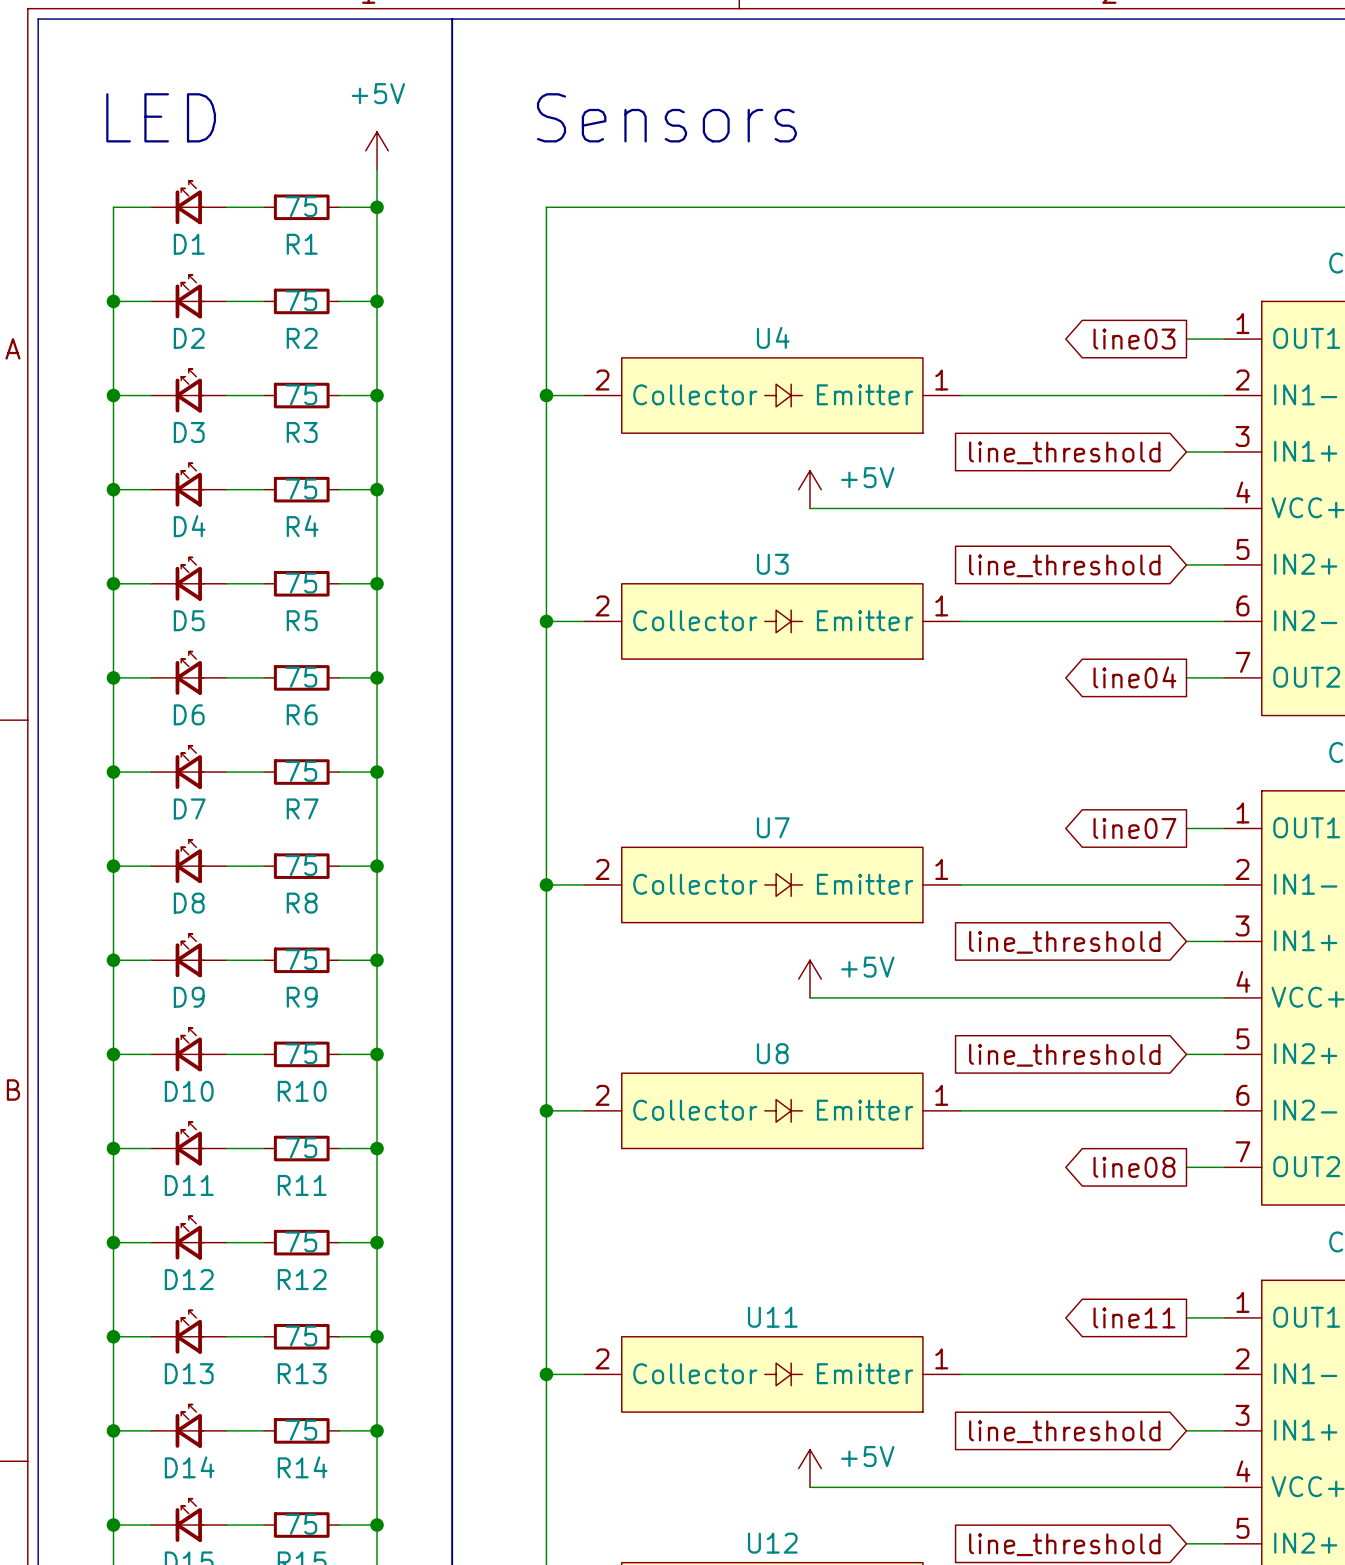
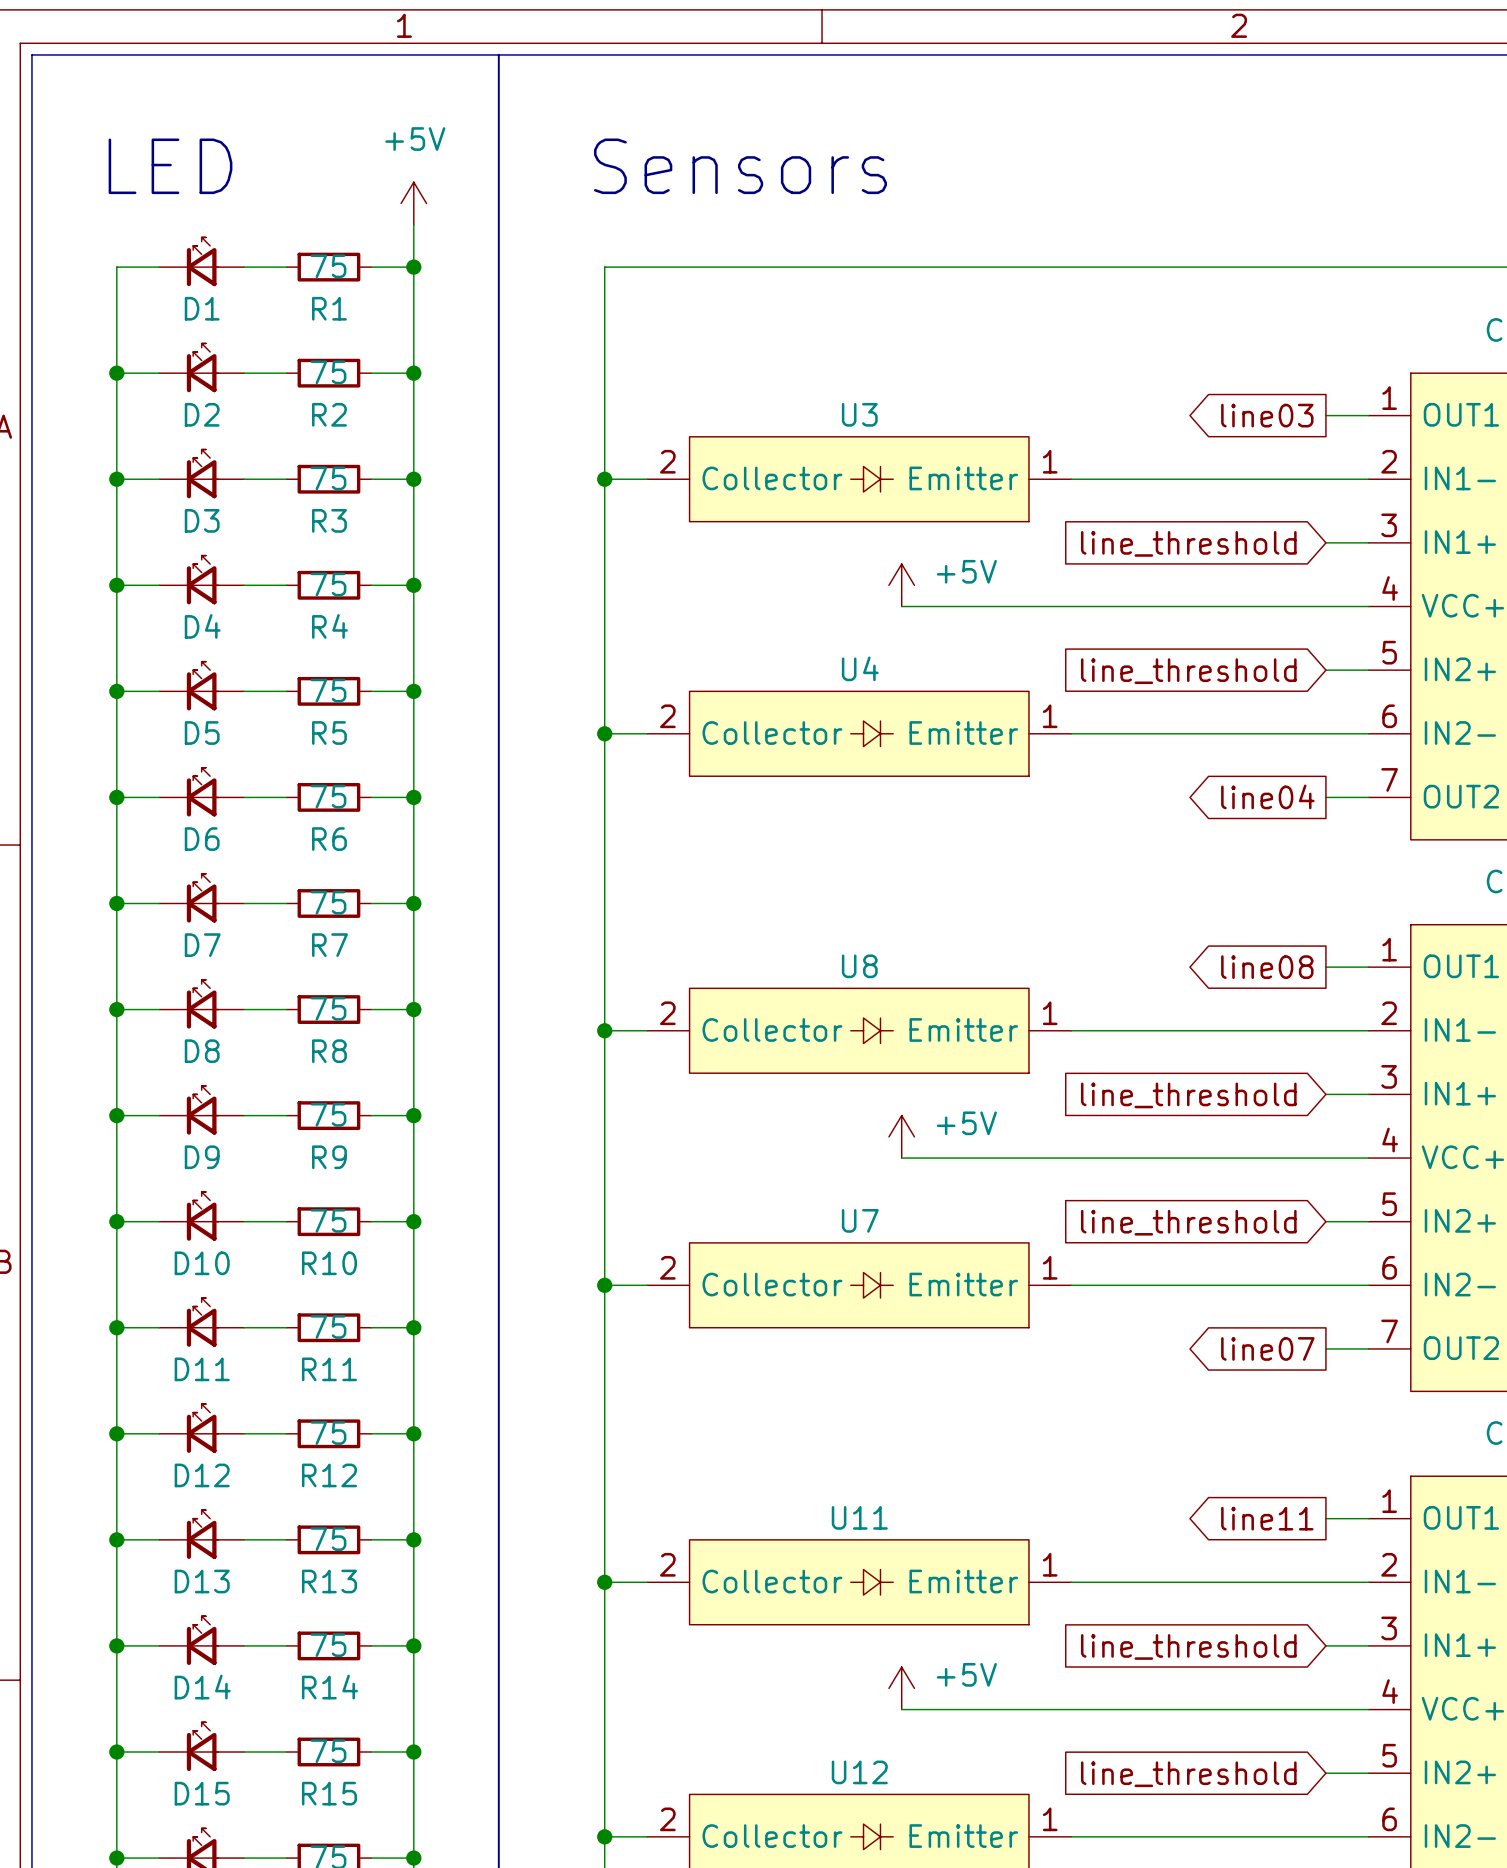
U4 name: U4 (773, 337) -> U3 (859, 414)
U3 name: U3 (772, 564) -> U4 (860, 668)
U7 name: U7 (773, 827) -> U8 (859, 966)
global label: line07 (1134, 828) -> line08 (1267, 967)
U8 name: U8 (772, 1053) -> U7 (860, 1220)
global label: line08 (1134, 1167) -> line07 (1267, 1348)

